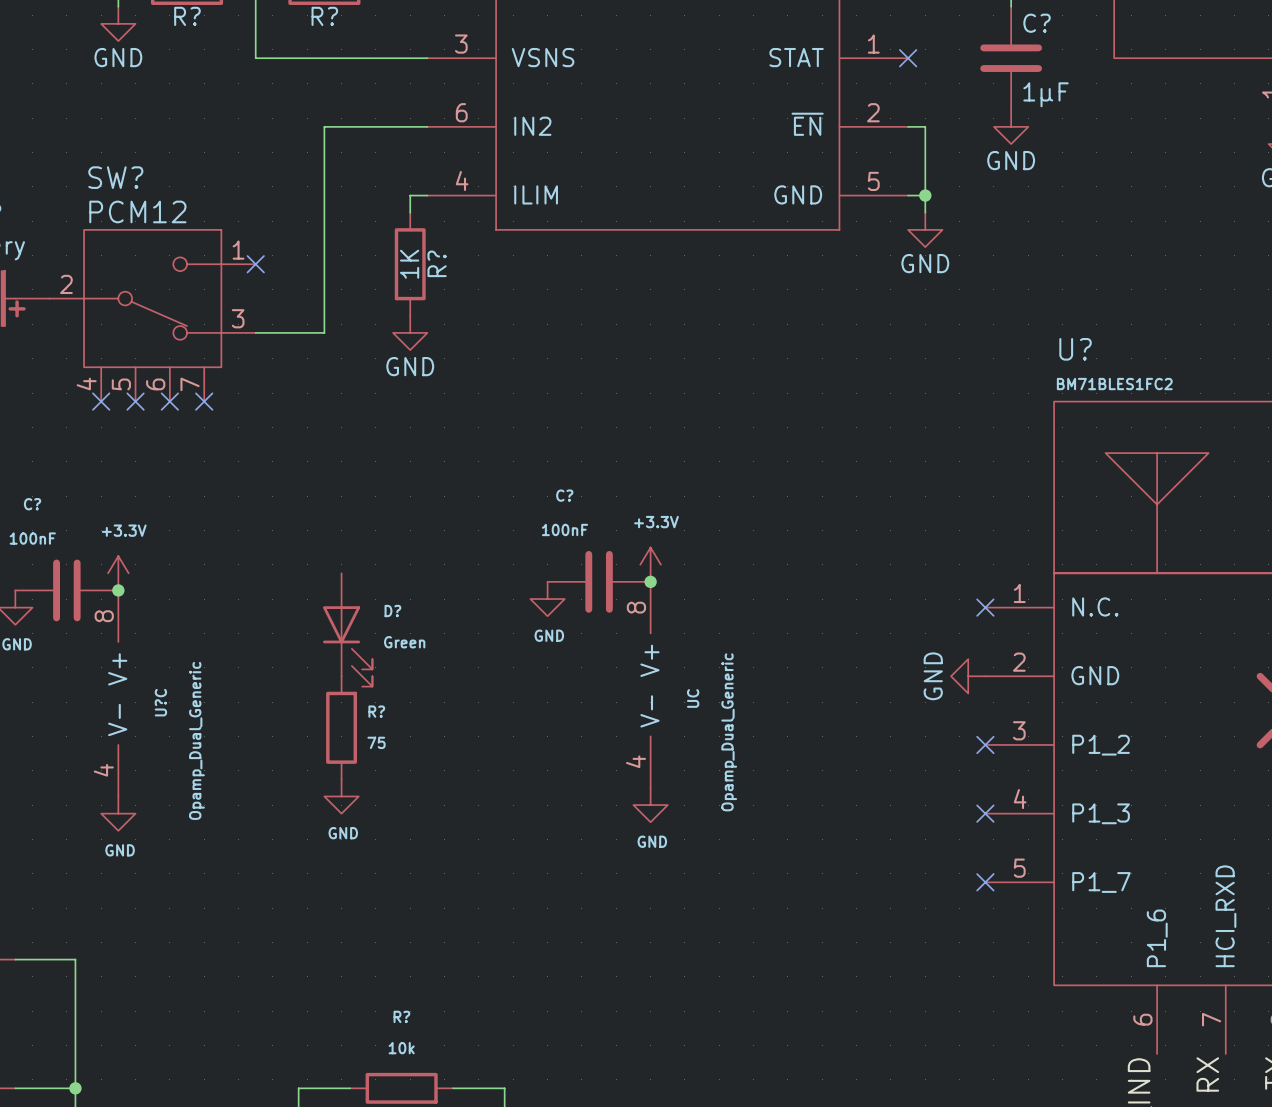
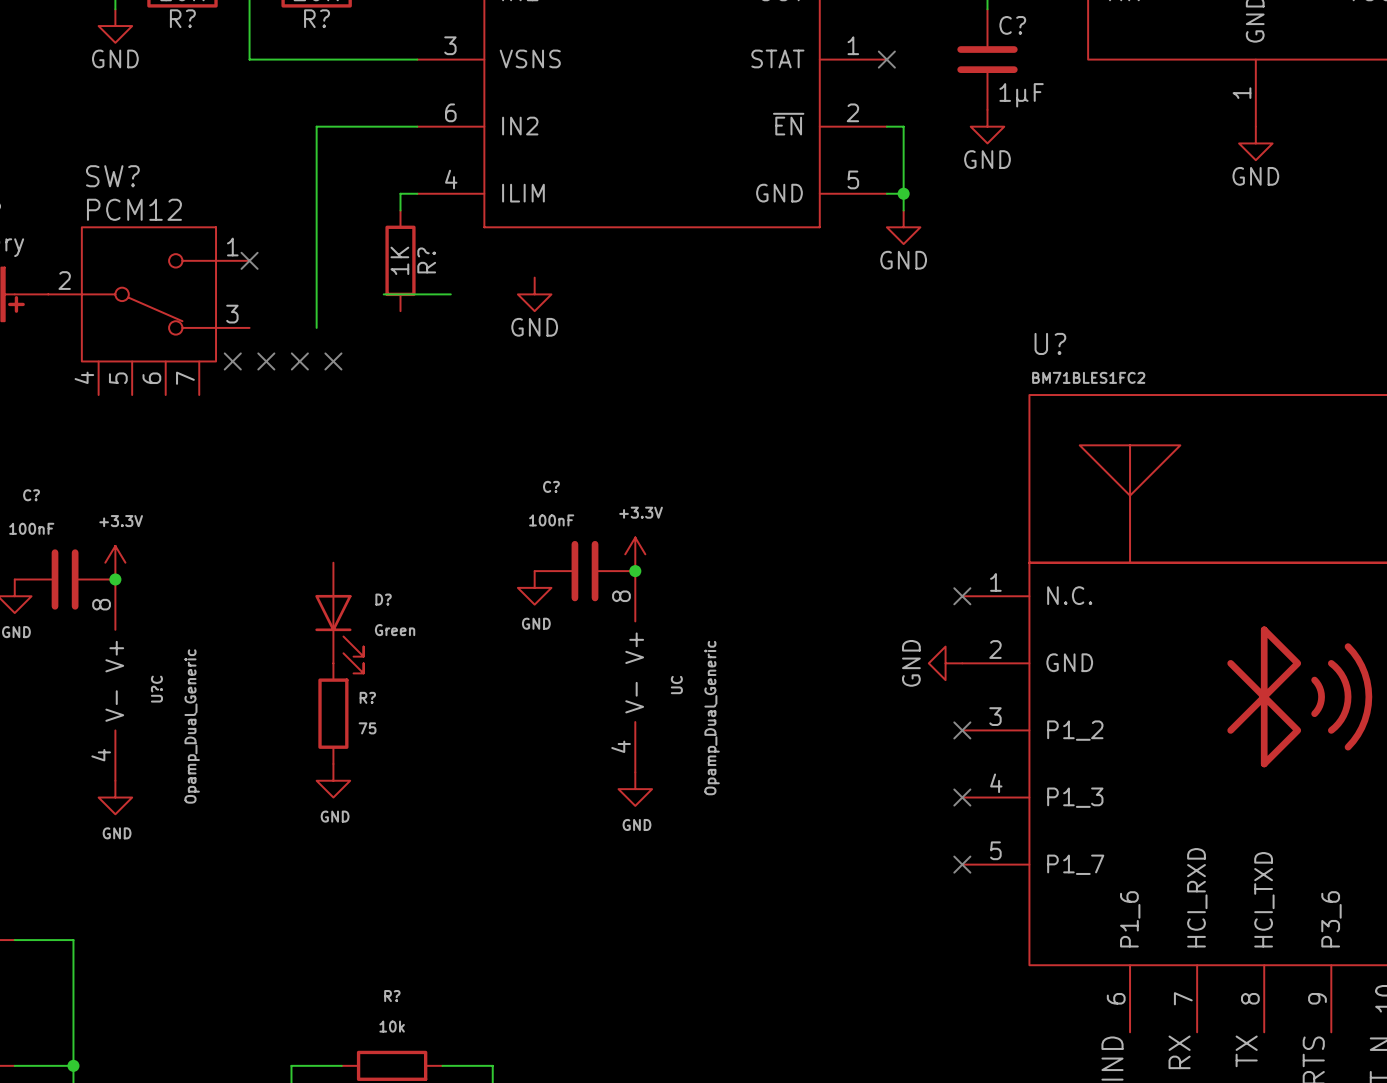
wire: (255, 332) (324, 332) -> (383, 294) (450, 294)
power symbol position: GND (410, 332) -> GND (534, 294)
no-connect mark: none -> (232, 361)
no-connect mark: none -> (266, 361)
no-connect mark: none -> (299, 361)
no-connect mark: none -> (333, 361)
no-connect mark: (101, 401) -> none
no-connect mark: (135, 401) -> none
no-connect mark: (169, 401) -> none
no-connect mark: (204, 401) -> none

